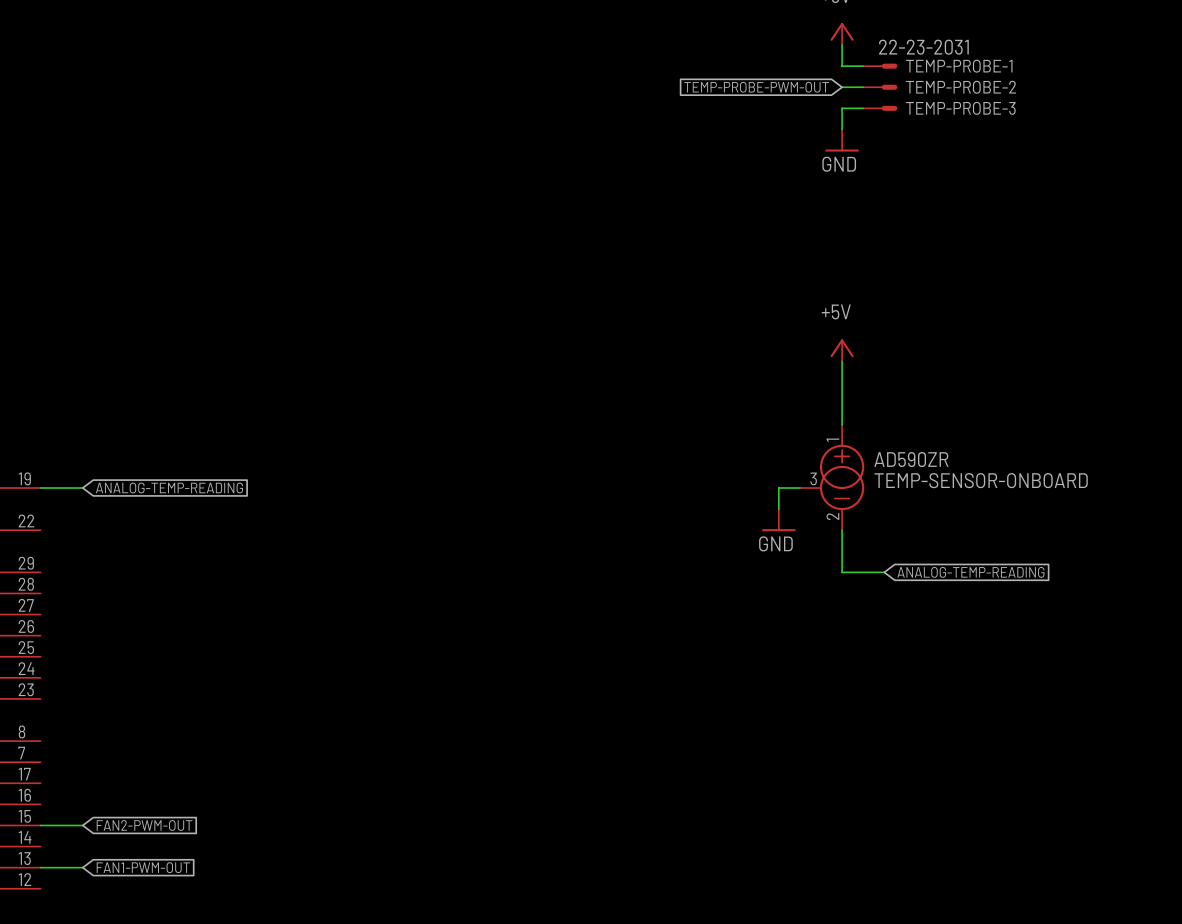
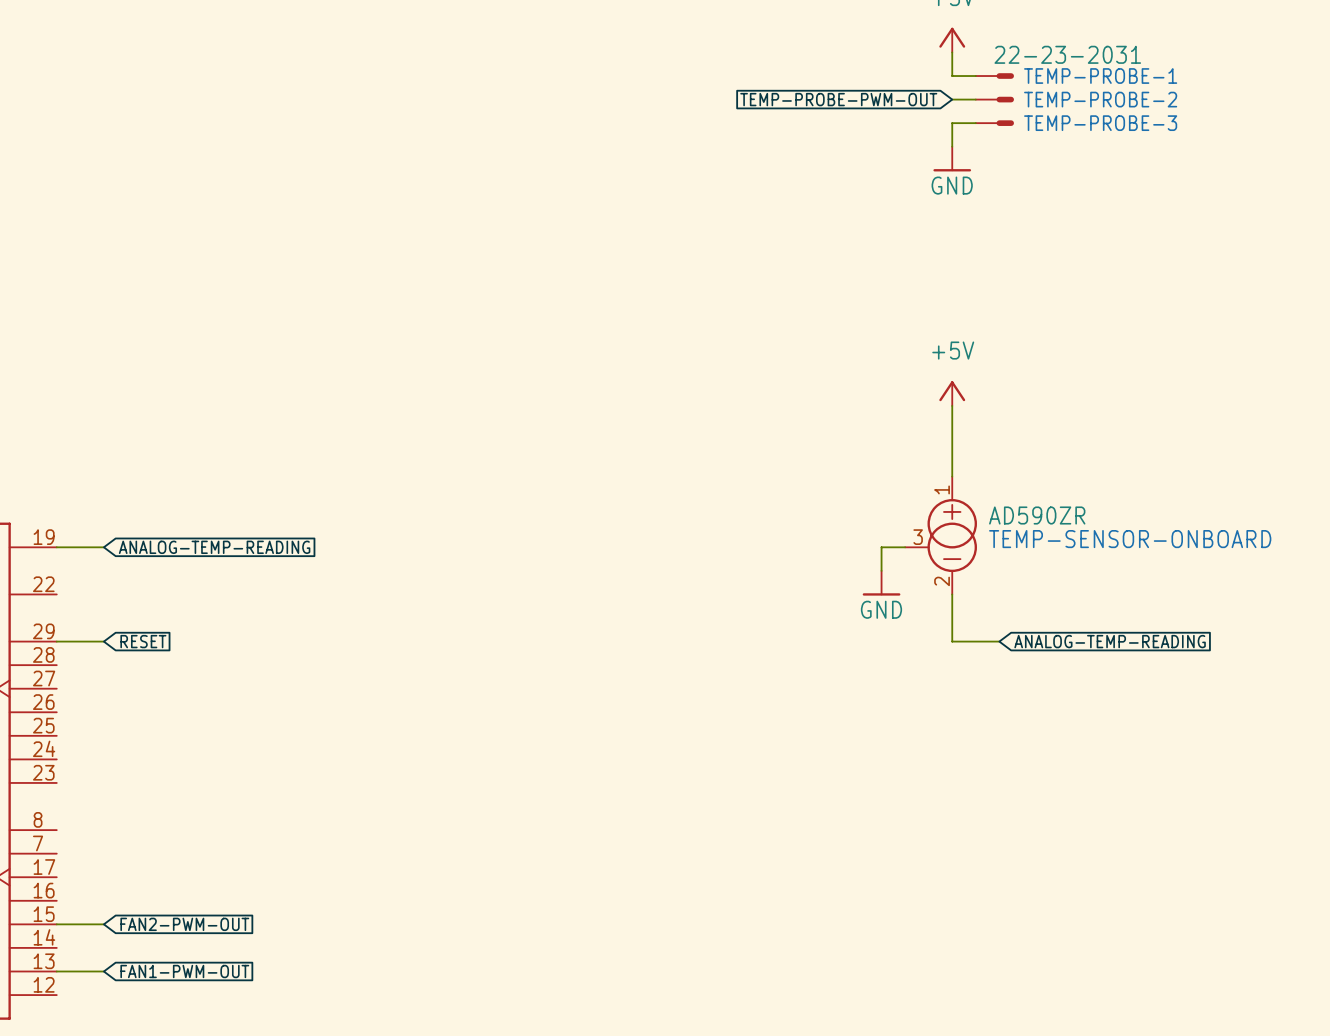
wire: none -> (56, 641) (103, 641)
global label: none -> RESET (143, 641)

